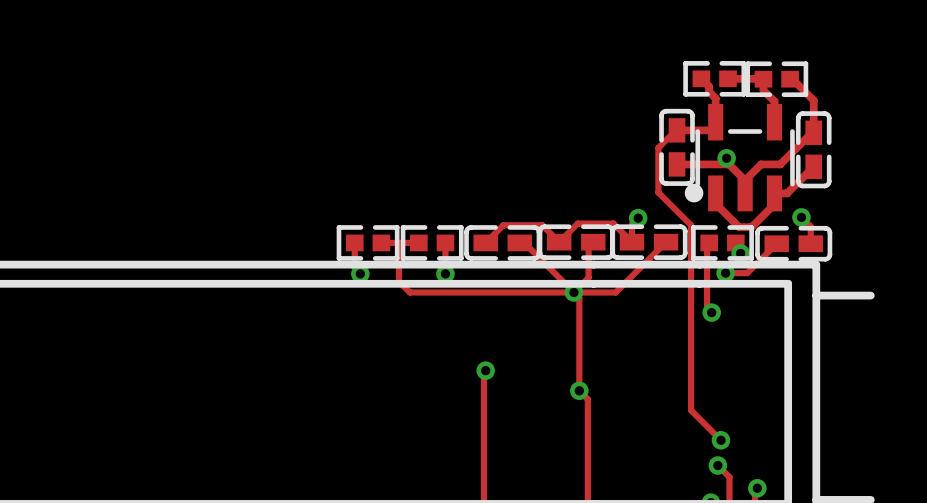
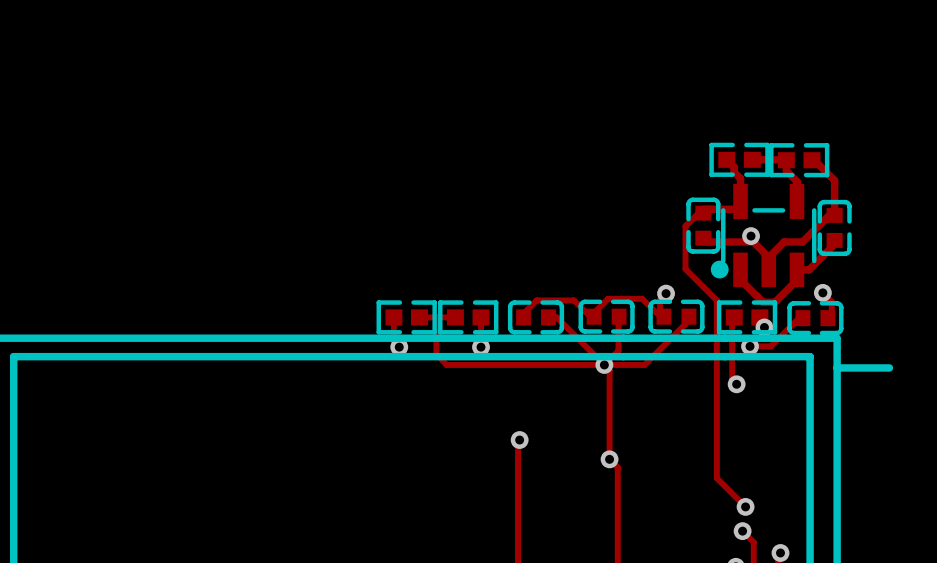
part footprint: [659, 108, 695, 186] -> [686, 197, 721, 254]
part footprint: [795, 111, 832, 189] -> [817, 199, 852, 257]
part footprint: [537, 224, 615, 260] -> [578, 299, 635, 334]
part footprint: [610, 224, 688, 260] -> [648, 299, 705, 334]
part footprint: [464, 225, 542, 261] -> [507, 300, 565, 335]
part footprint: [755, 225, 833, 262] -> [787, 301, 844, 336]

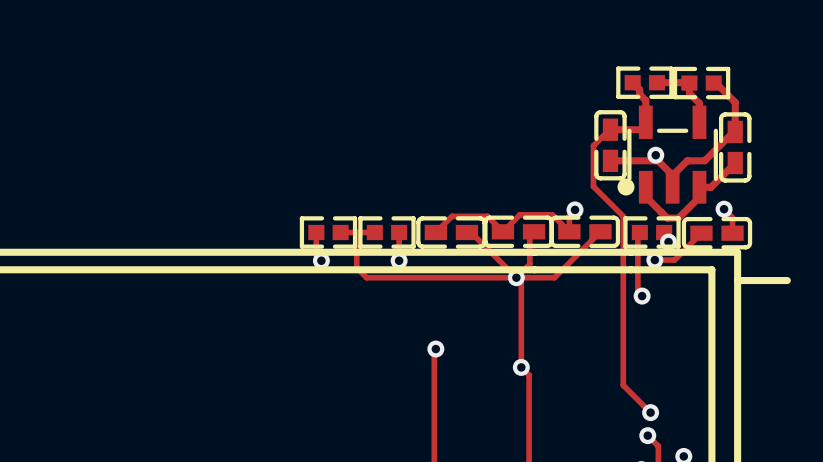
part footprint: [686, 197, 721, 254] -> [594, 110, 627, 181]
part footprint: [817, 199, 852, 257] -> [719, 112, 752, 183]
part footprint: [578, 299, 635, 334] -> [483, 215, 554, 249]
part footprint: [648, 299, 705, 334] -> [549, 215, 621, 249]
part footprint: [507, 300, 565, 335] -> [416, 216, 487, 249]
part footprint: [787, 301, 844, 336] -> [681, 216, 753, 250]

